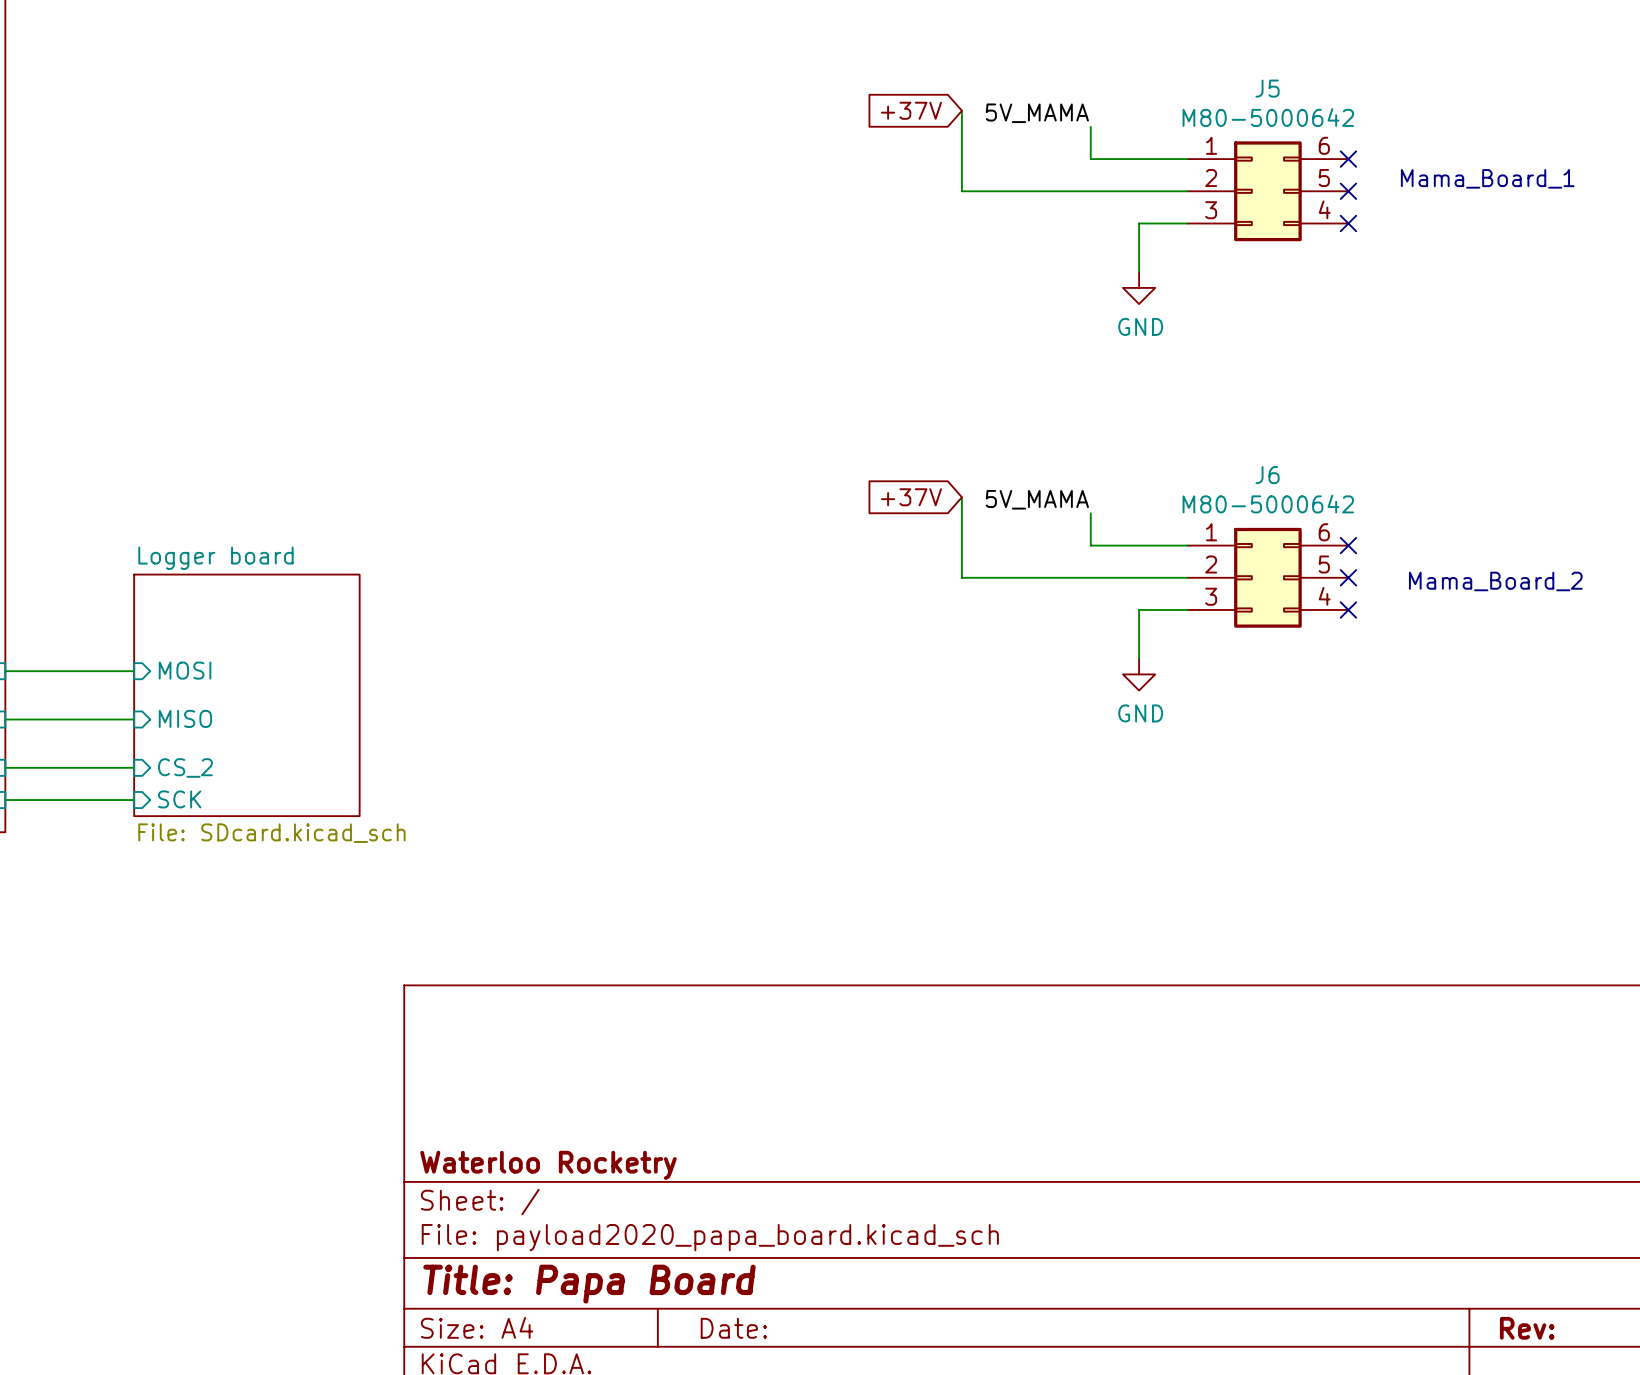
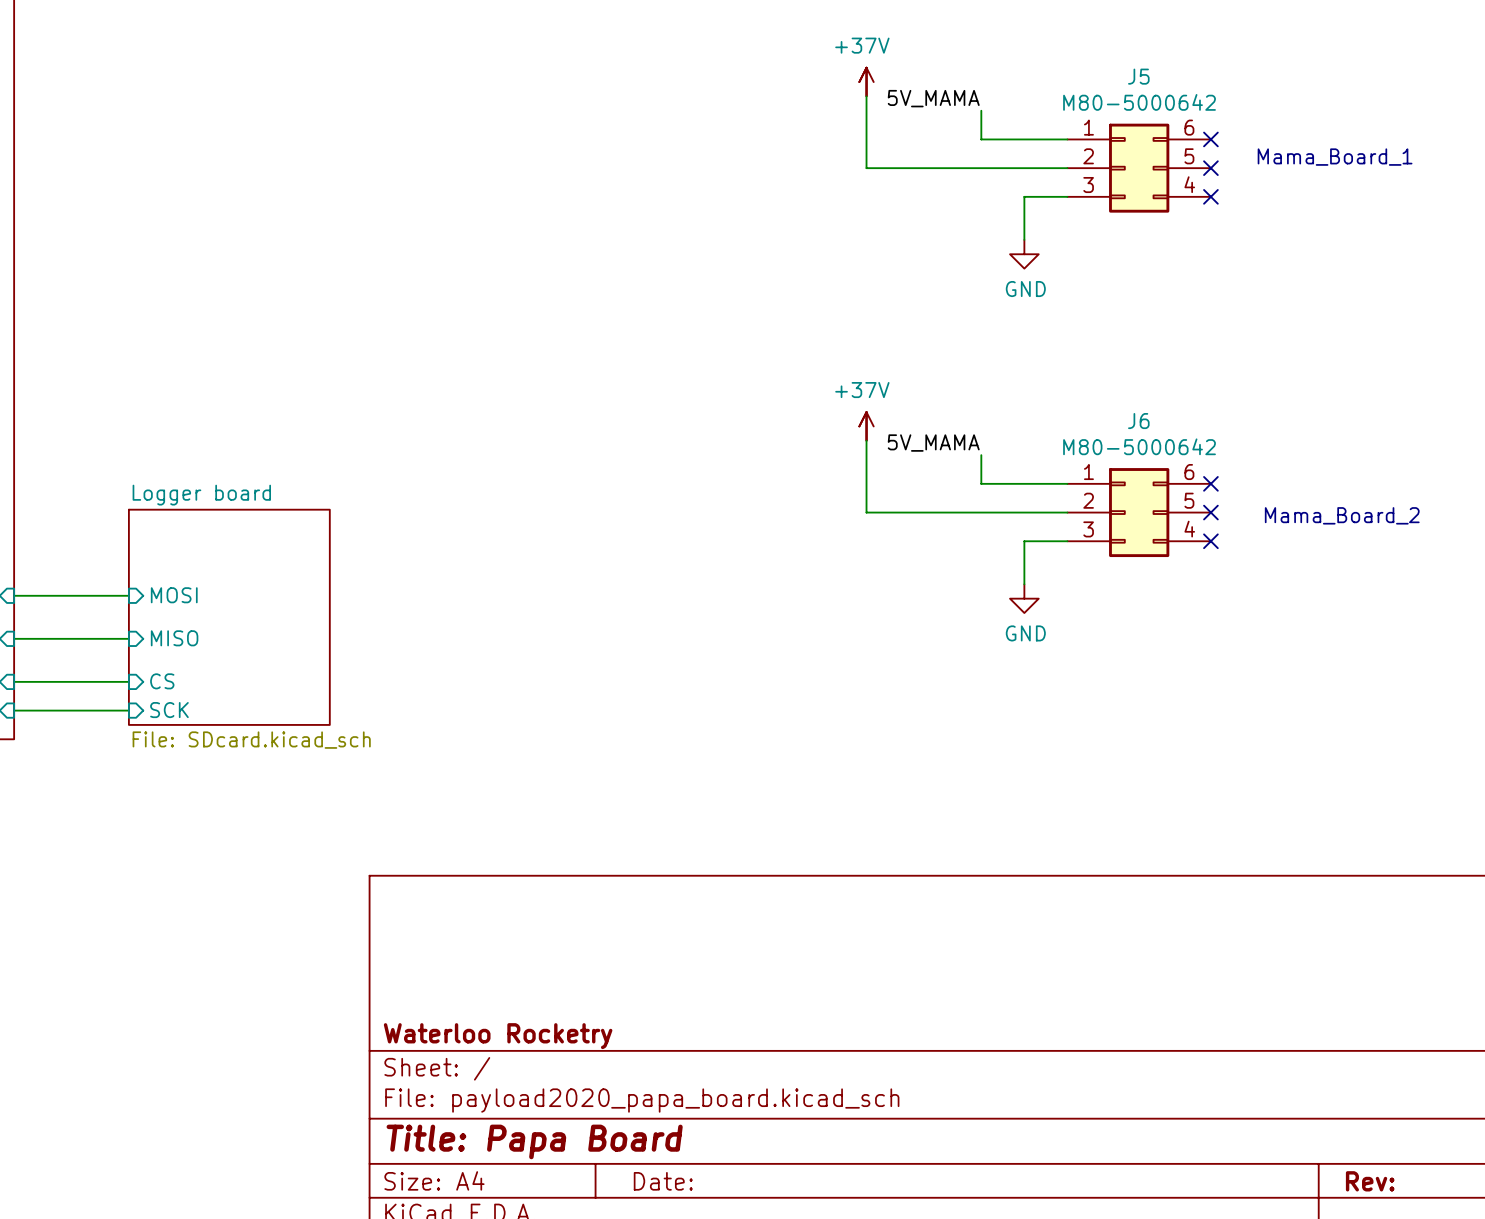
power symbol: none -> +37V (866, 82)
global label: +37V (911, 110) -> none
power symbol: none -> +37V (866, 426)
global label: +37V (911, 497) -> none
sheet pin: CS_2 (185, 767) -> CS (162, 681)

